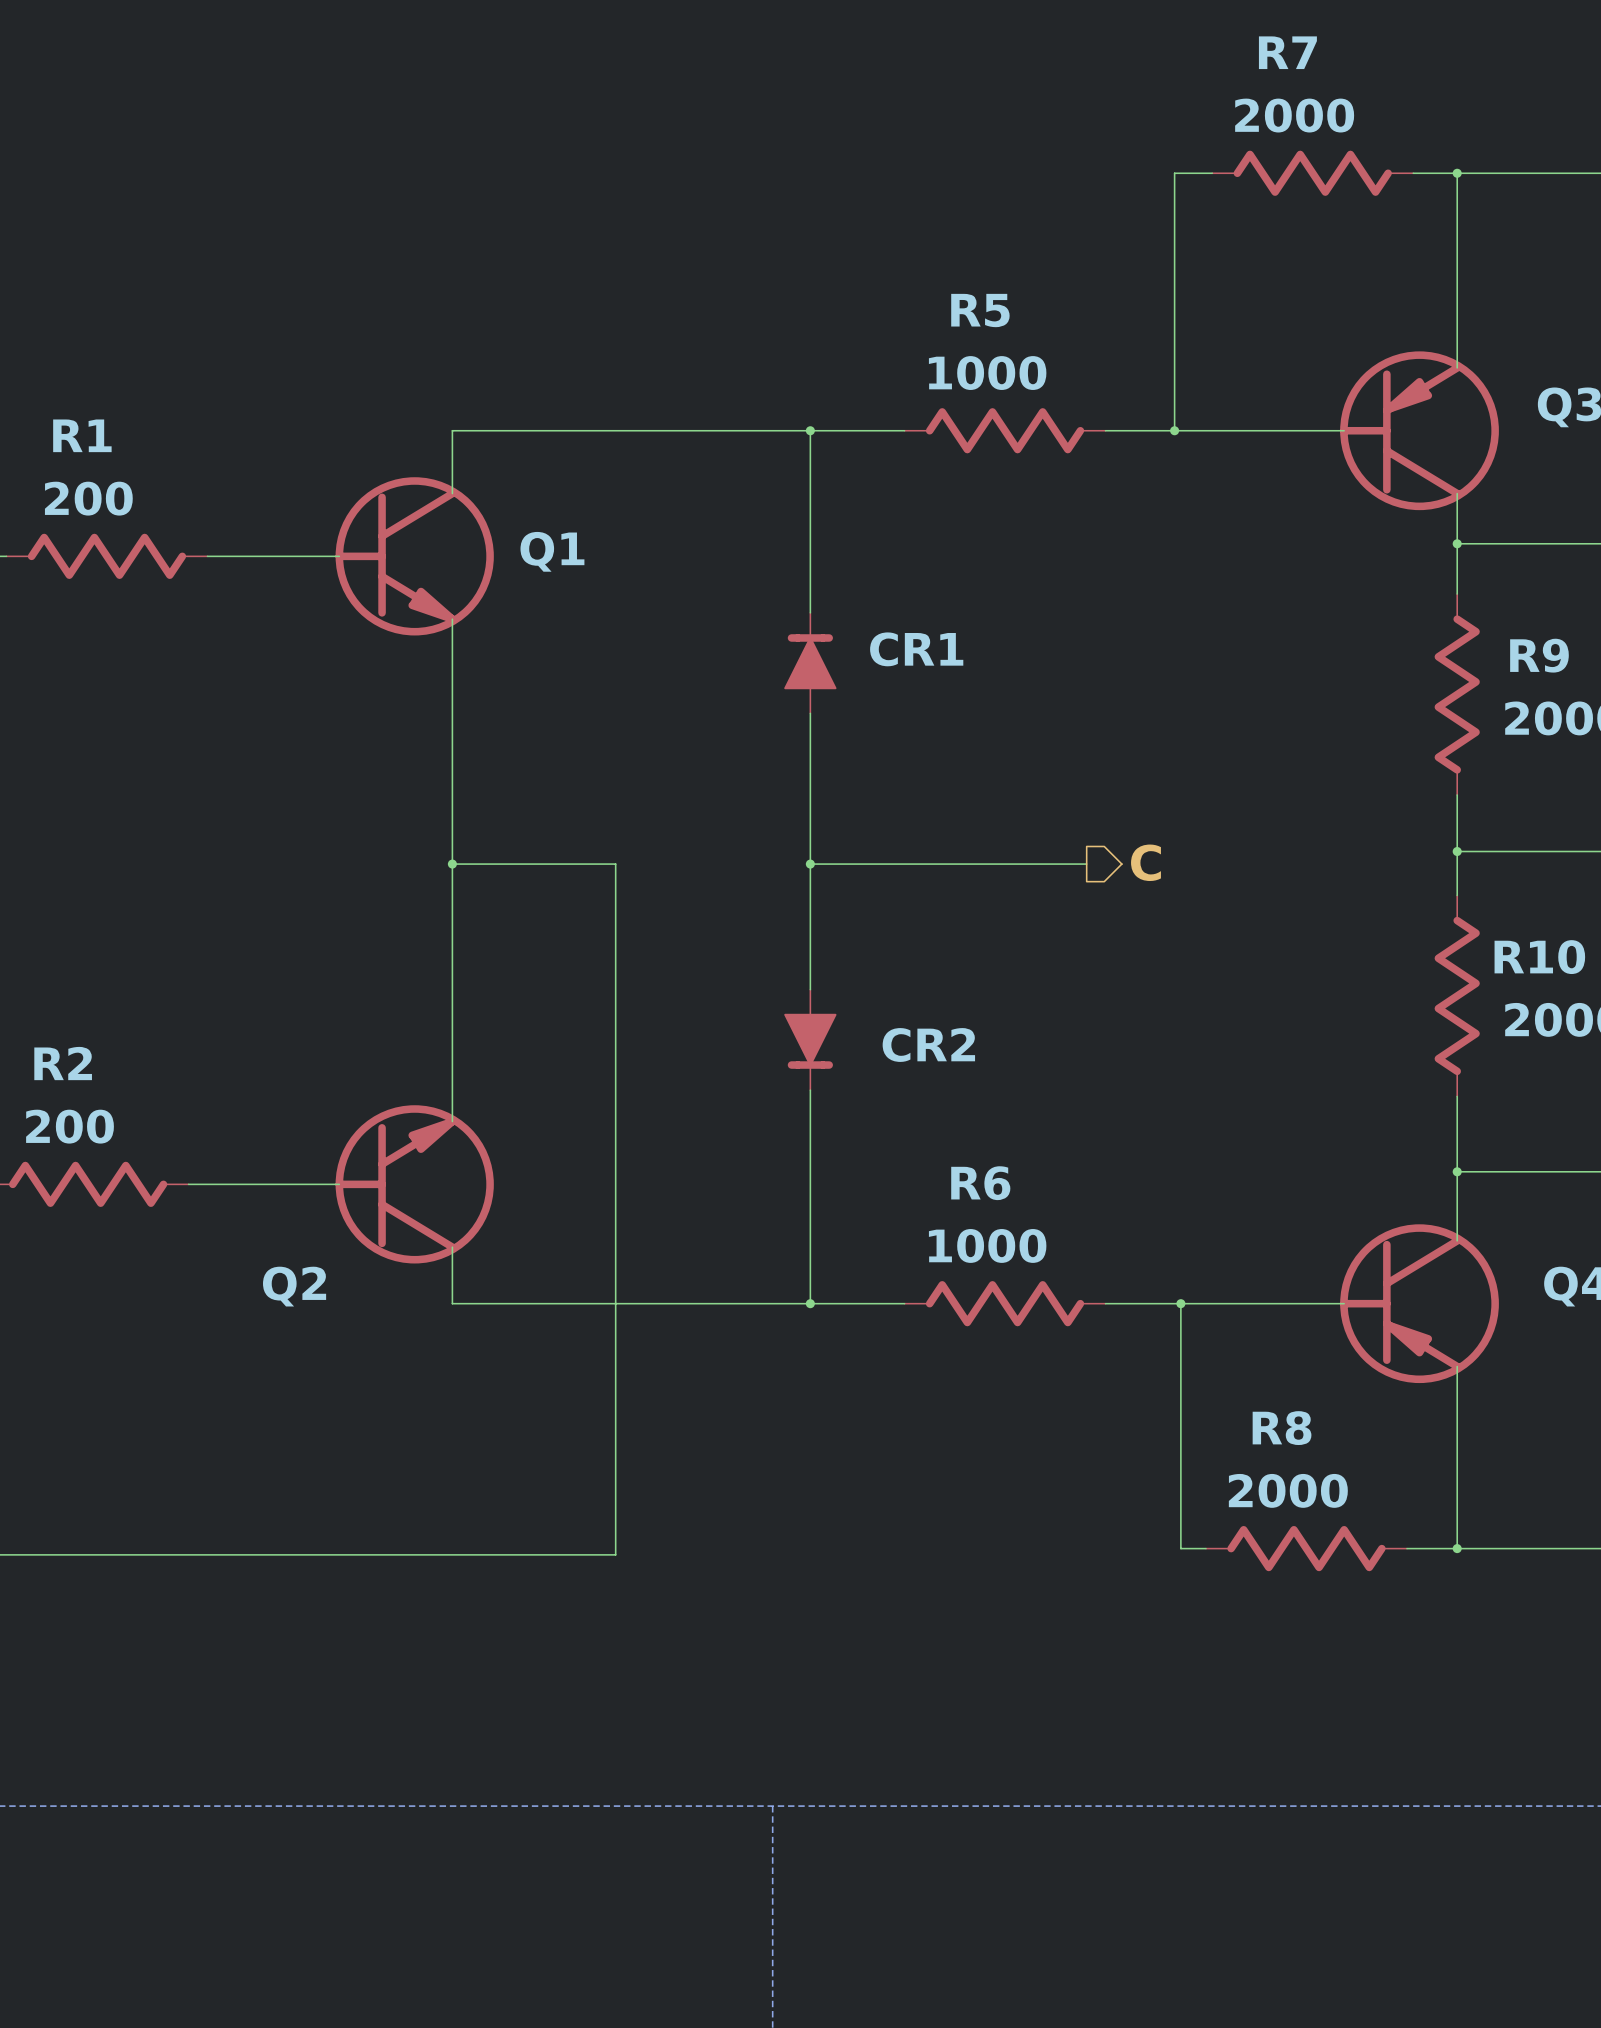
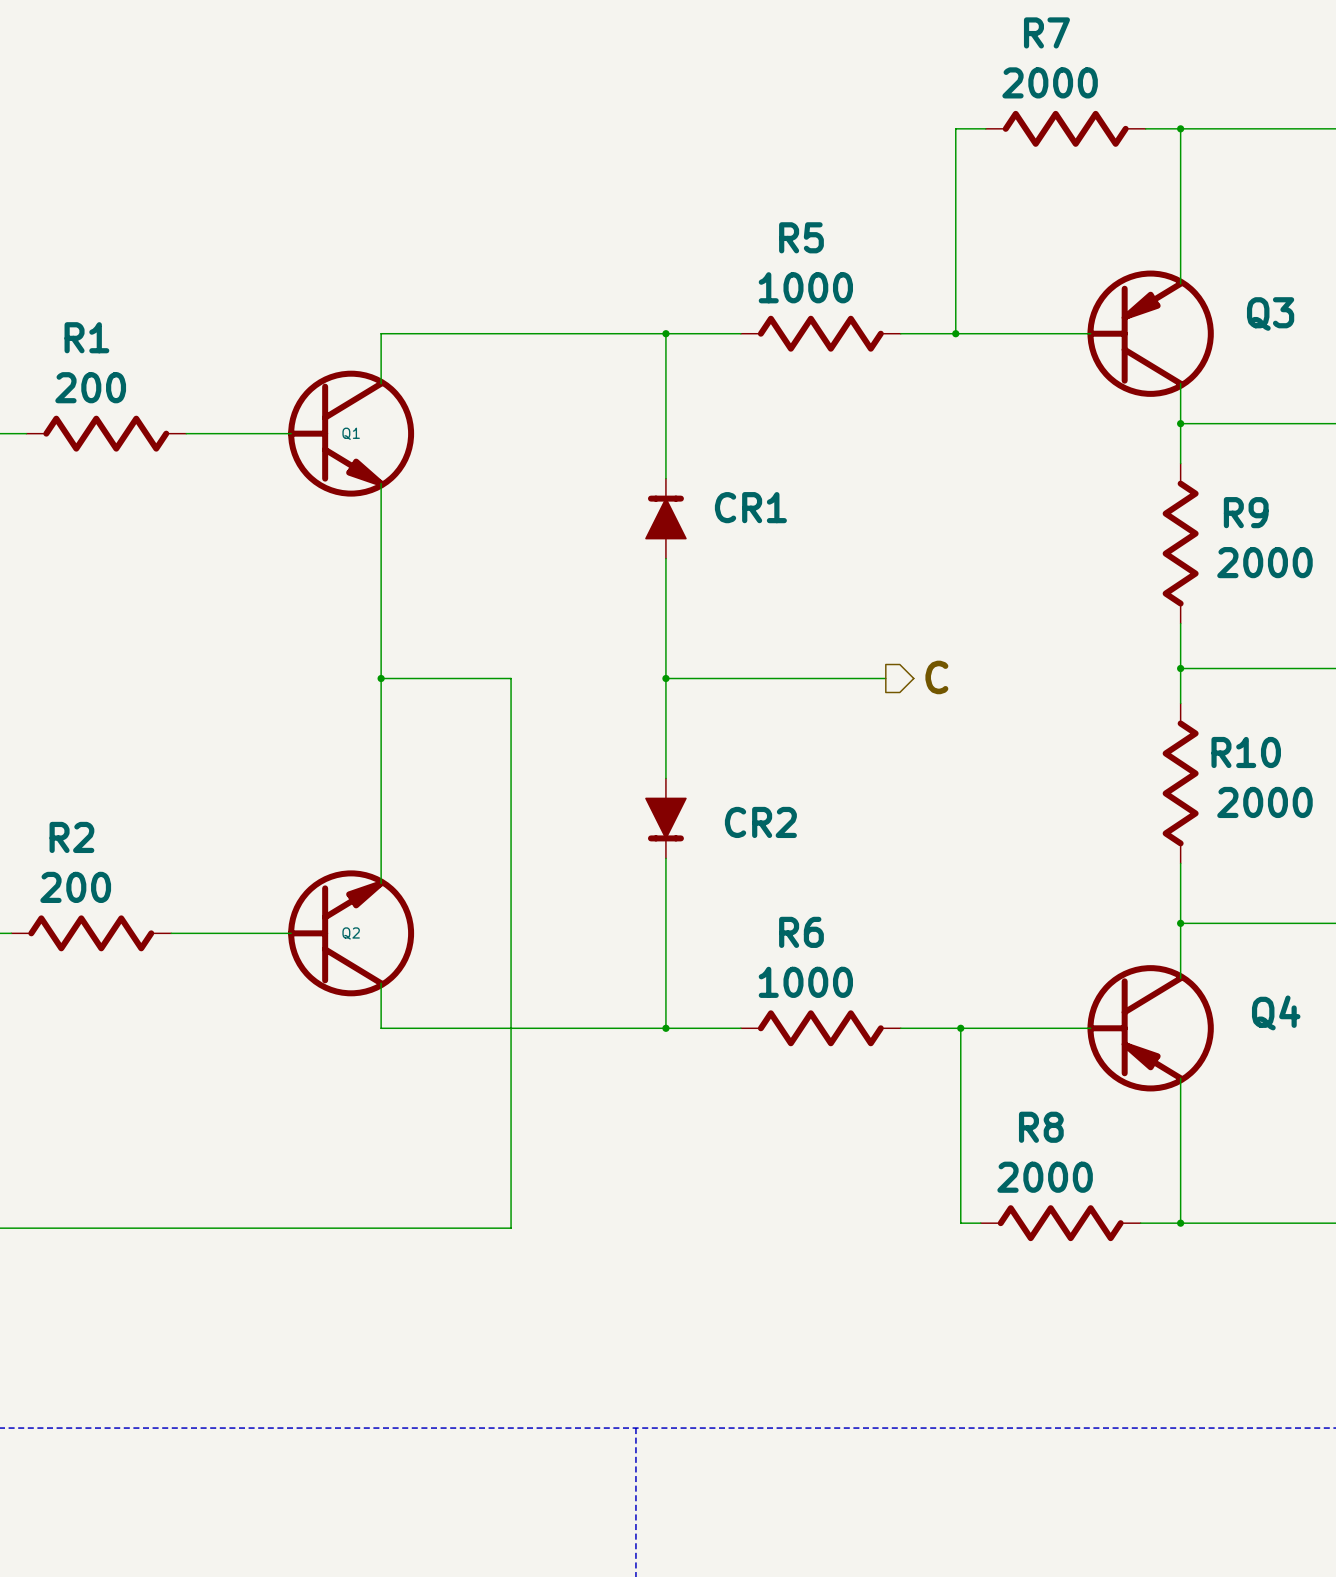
part text: Q1 (552, 551) -> none
part text: none -> Q1 (351, 433)
part text: none -> Q2 (351, 933)
part text: Q2 (294, 1286) -> none

